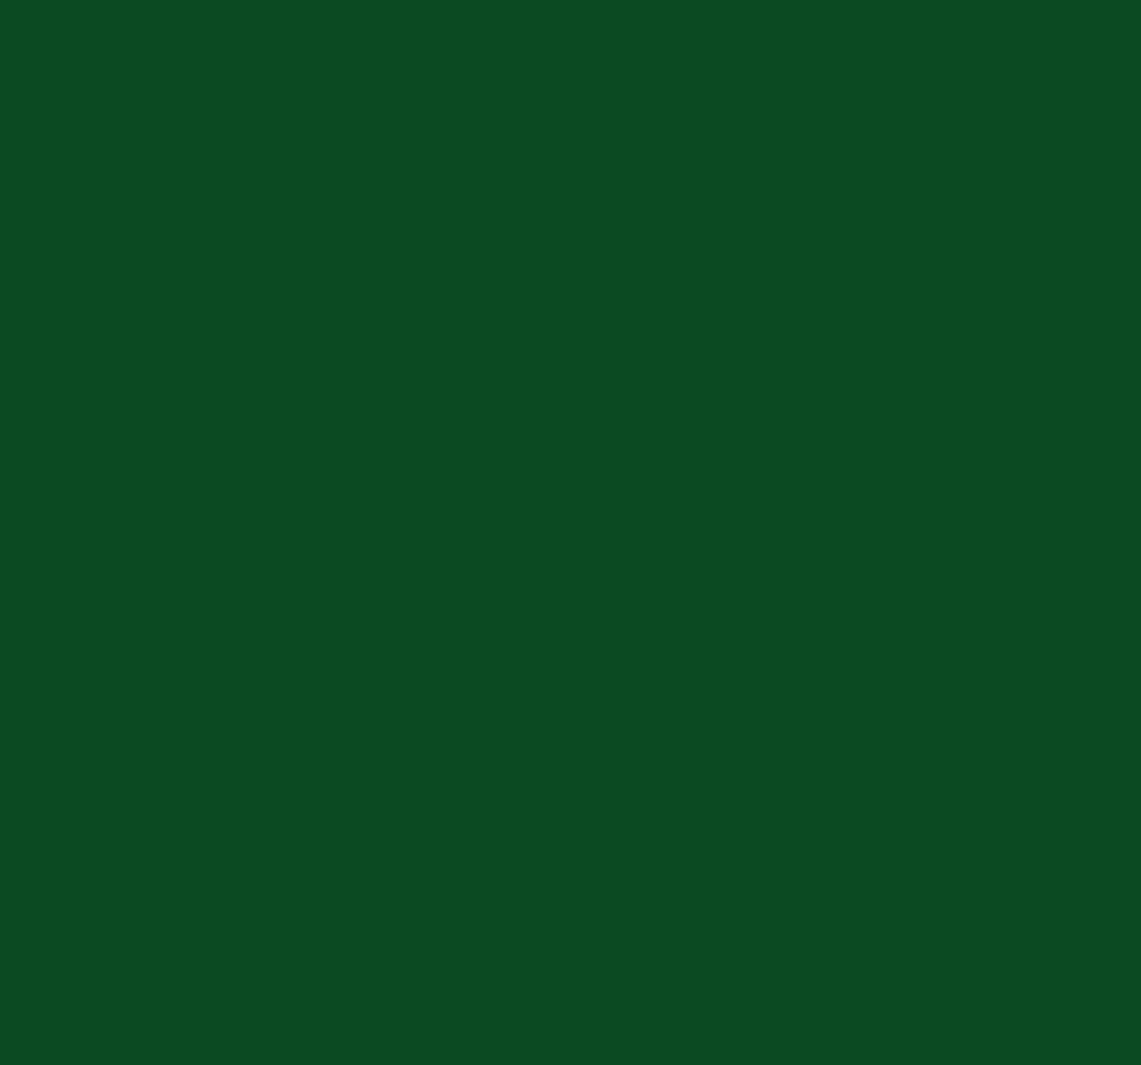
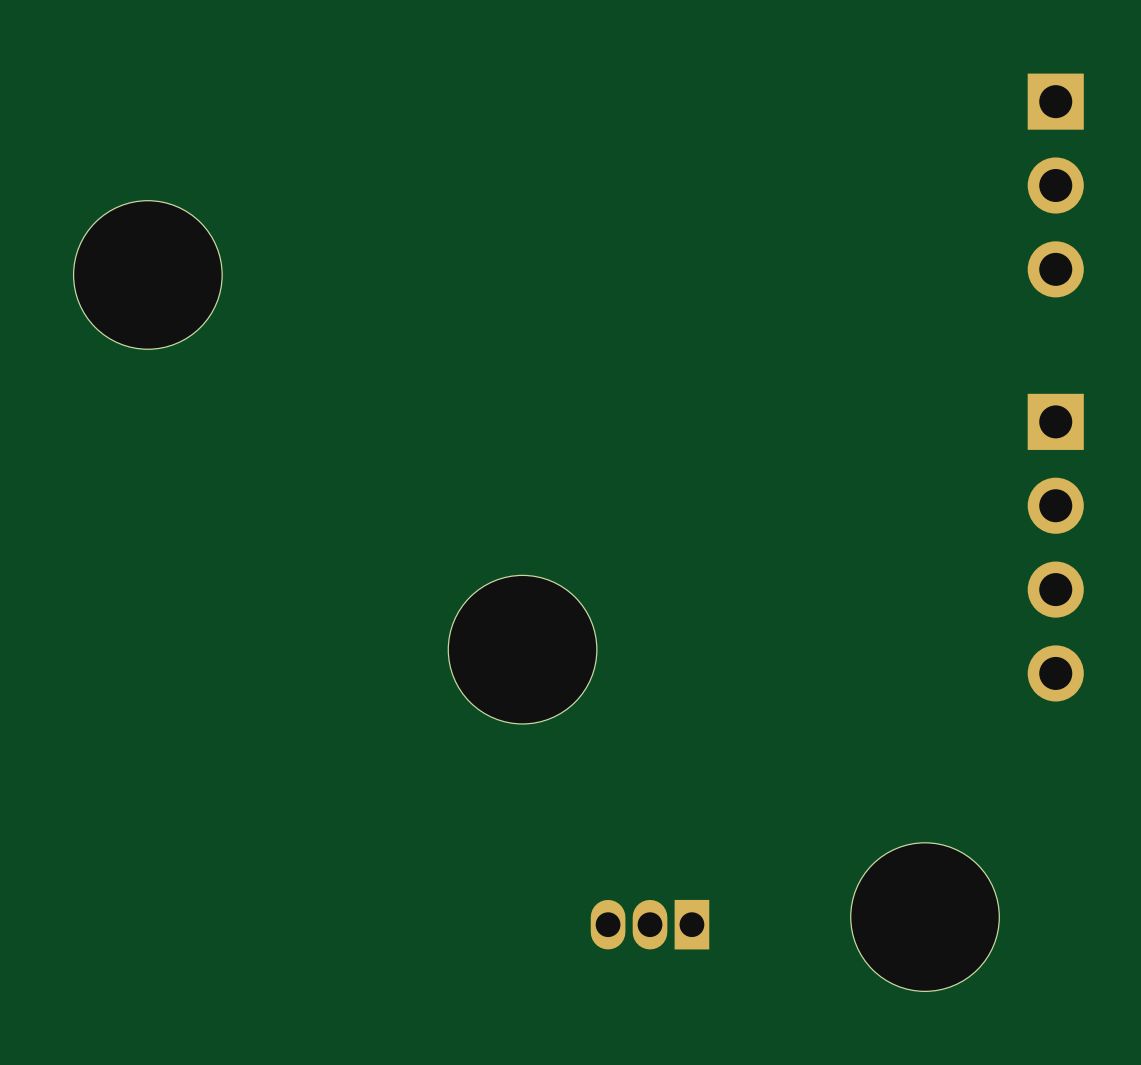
part: none -> (1055, 185)
part: none -> (147, 274)
part: none -> (1055, 547)
part: none -> (522, 649)
part: none -> (925, 917)
part: none -> (650, 924)

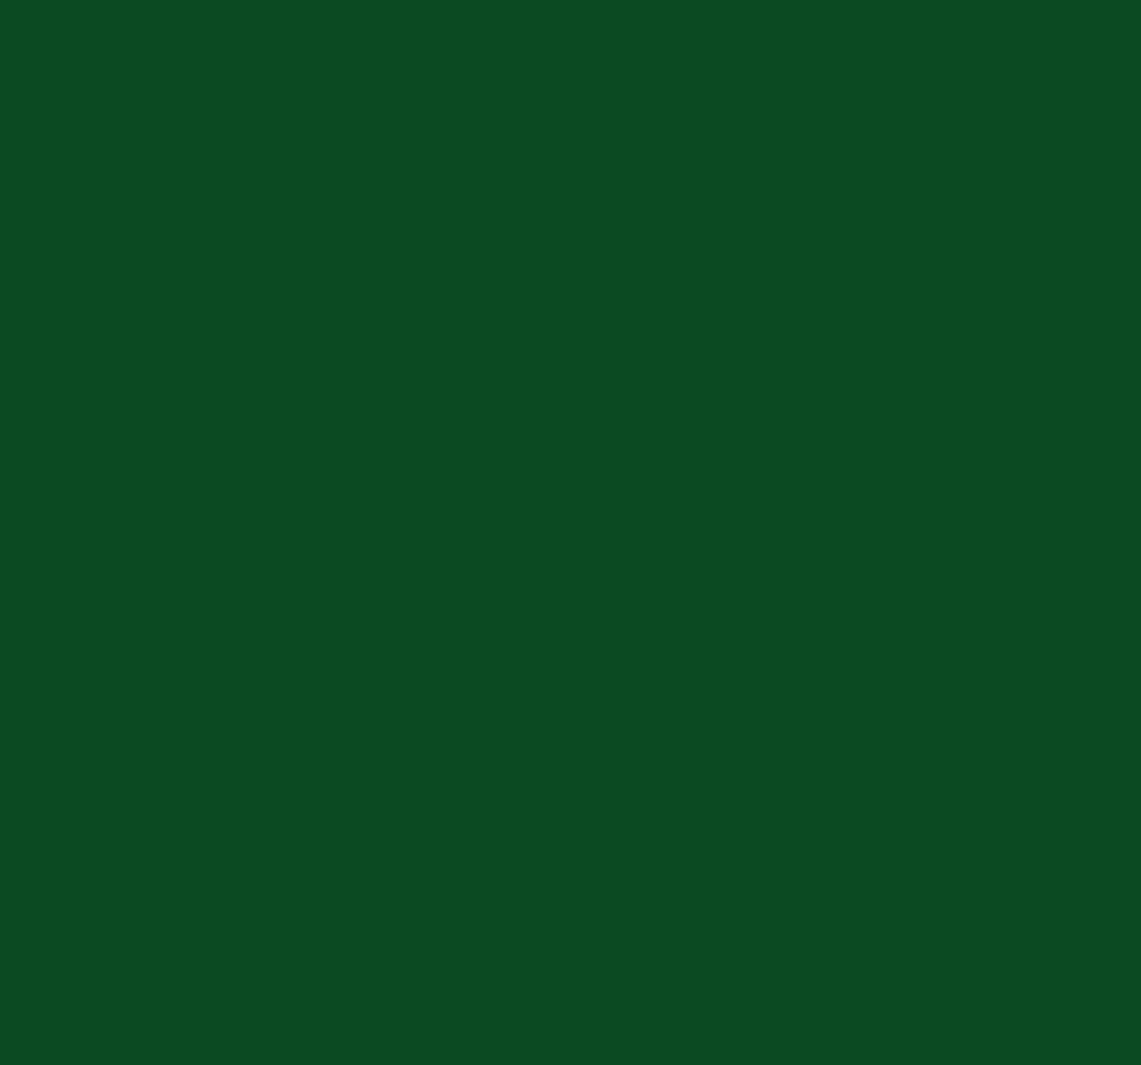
part: (1055, 185) -> none
part: (147, 274) -> none
part: (1055, 547) -> none
part: (522, 649) -> none
part: (925, 917) -> none
part: (650, 924) -> none

